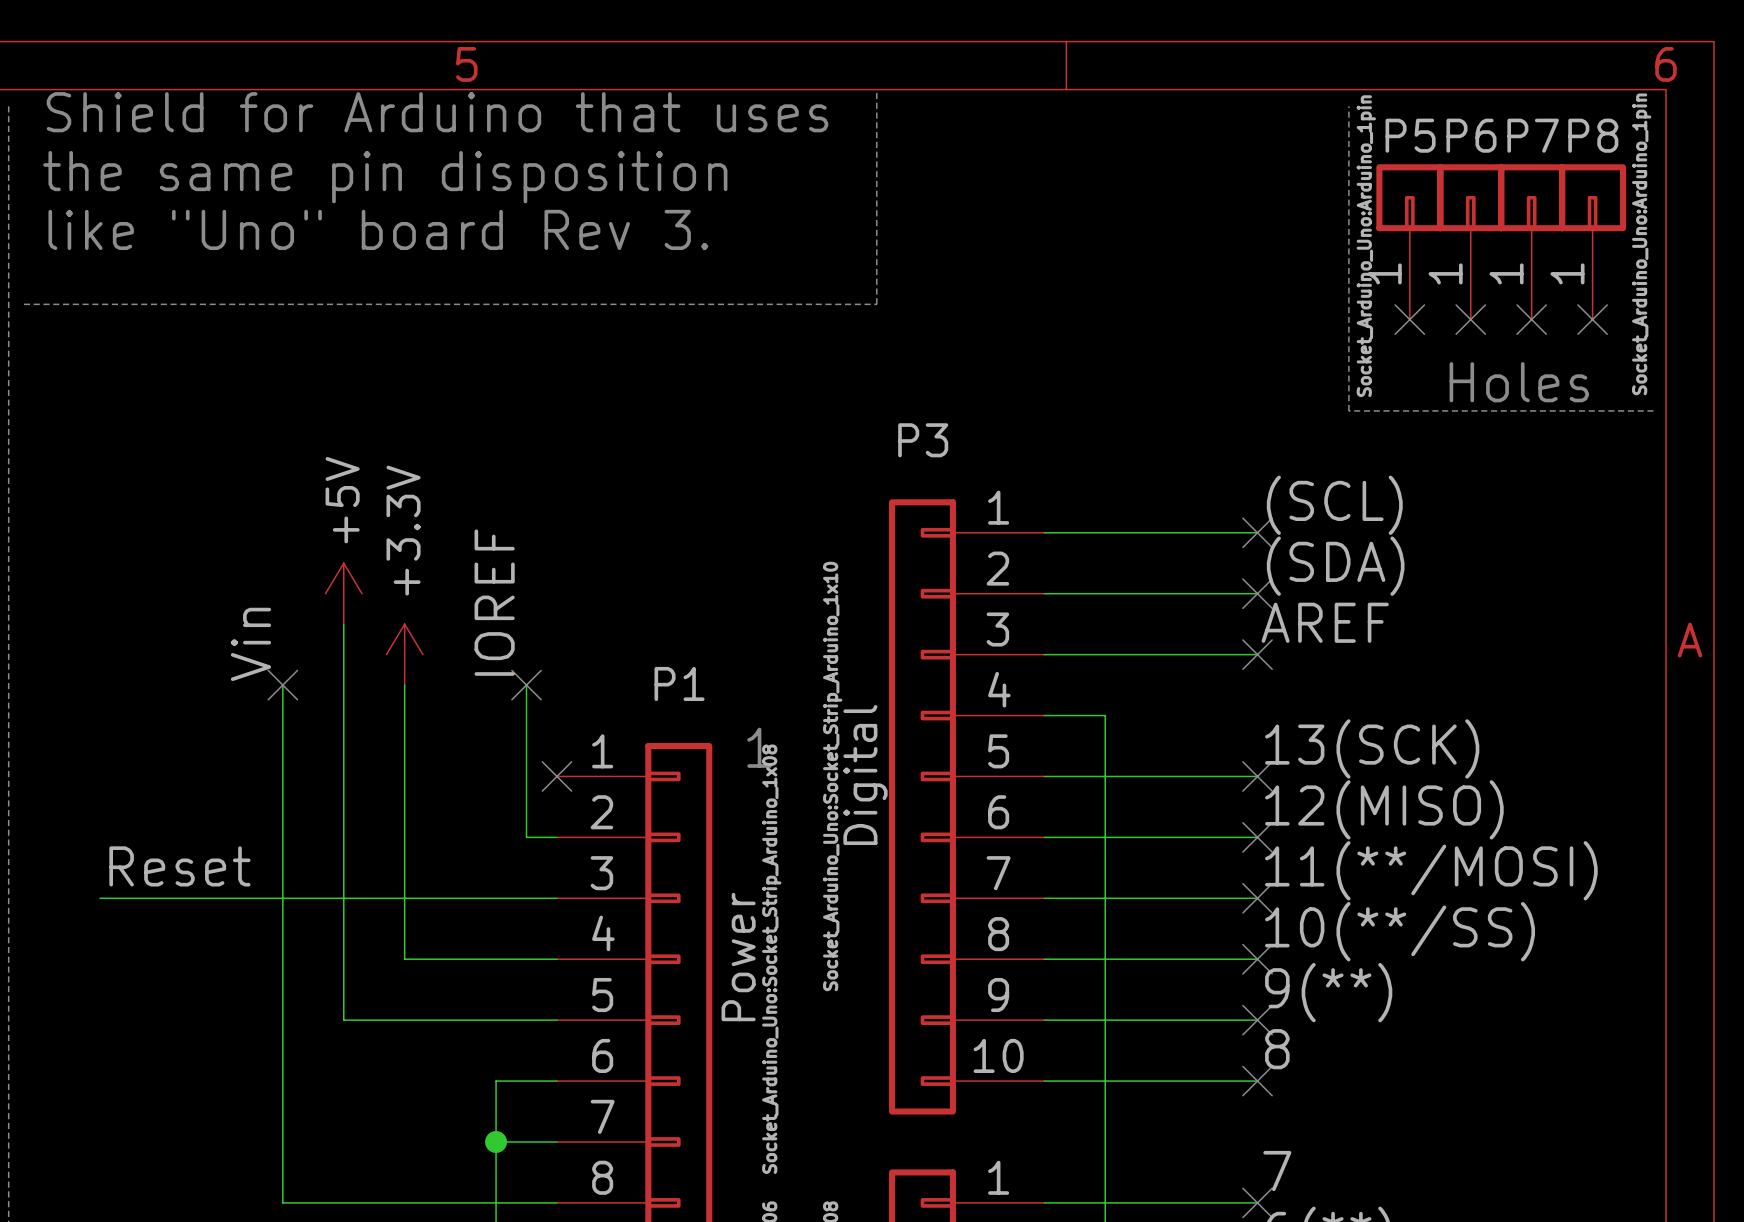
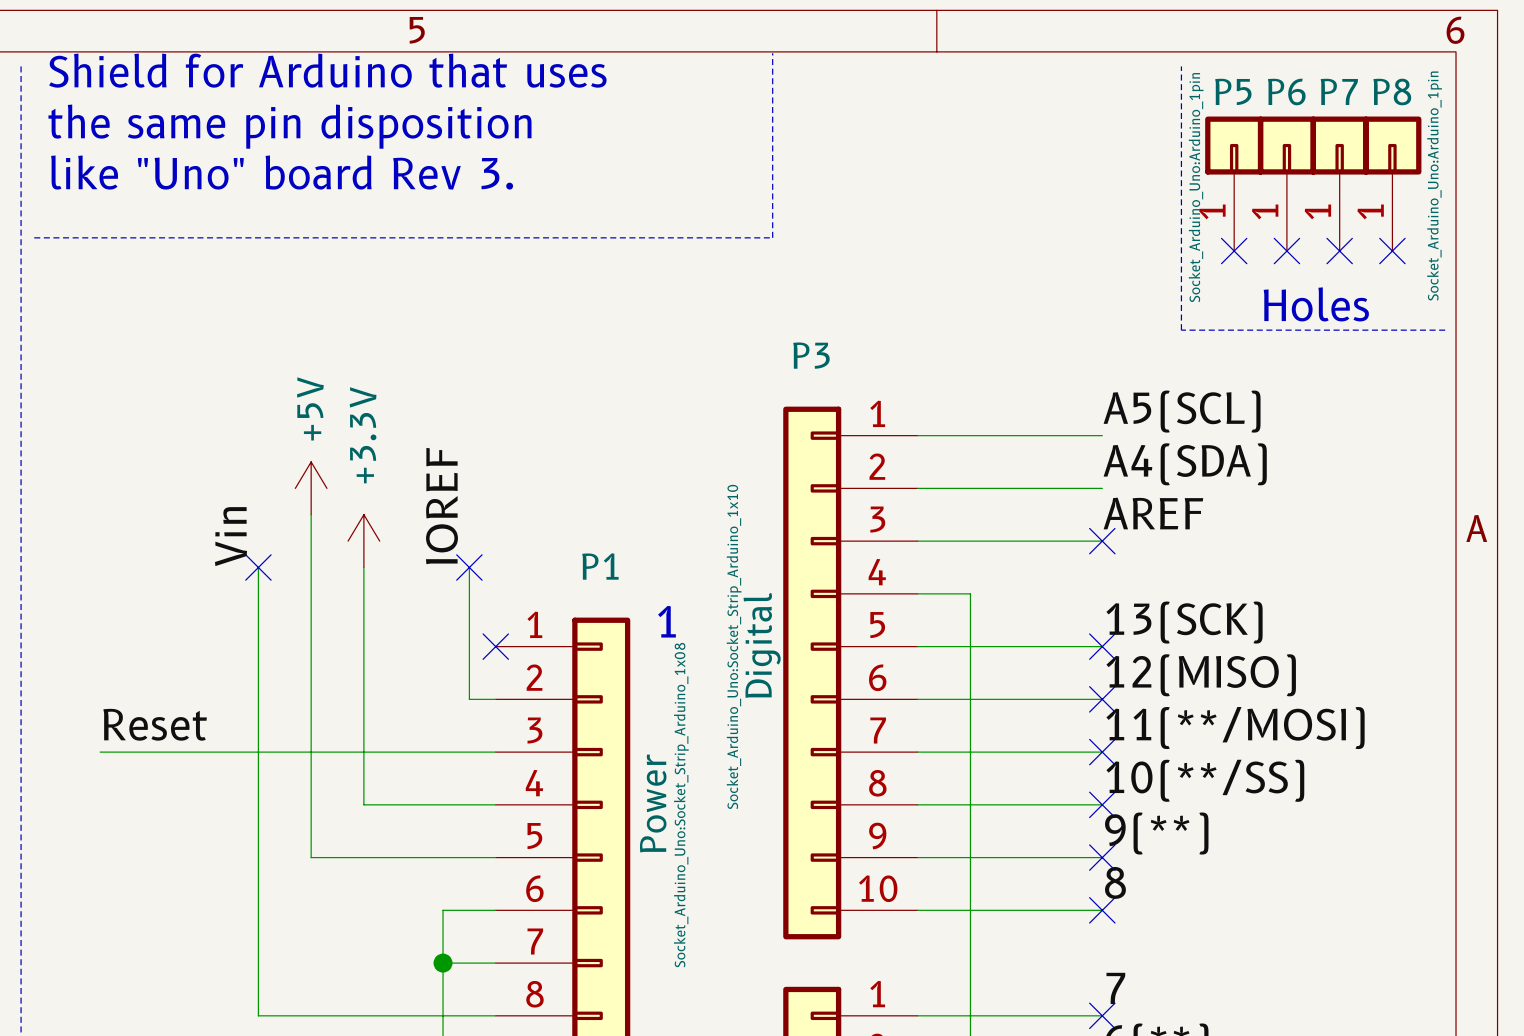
label: (SCL) (1334, 505) -> A5(SCL) (1182, 411)
no-connect mark: (1257, 532) -> none
label: (SDA) (1335, 566) -> A4(SDA) (1185, 464)
no-connect mark: (1257, 593) -> none

